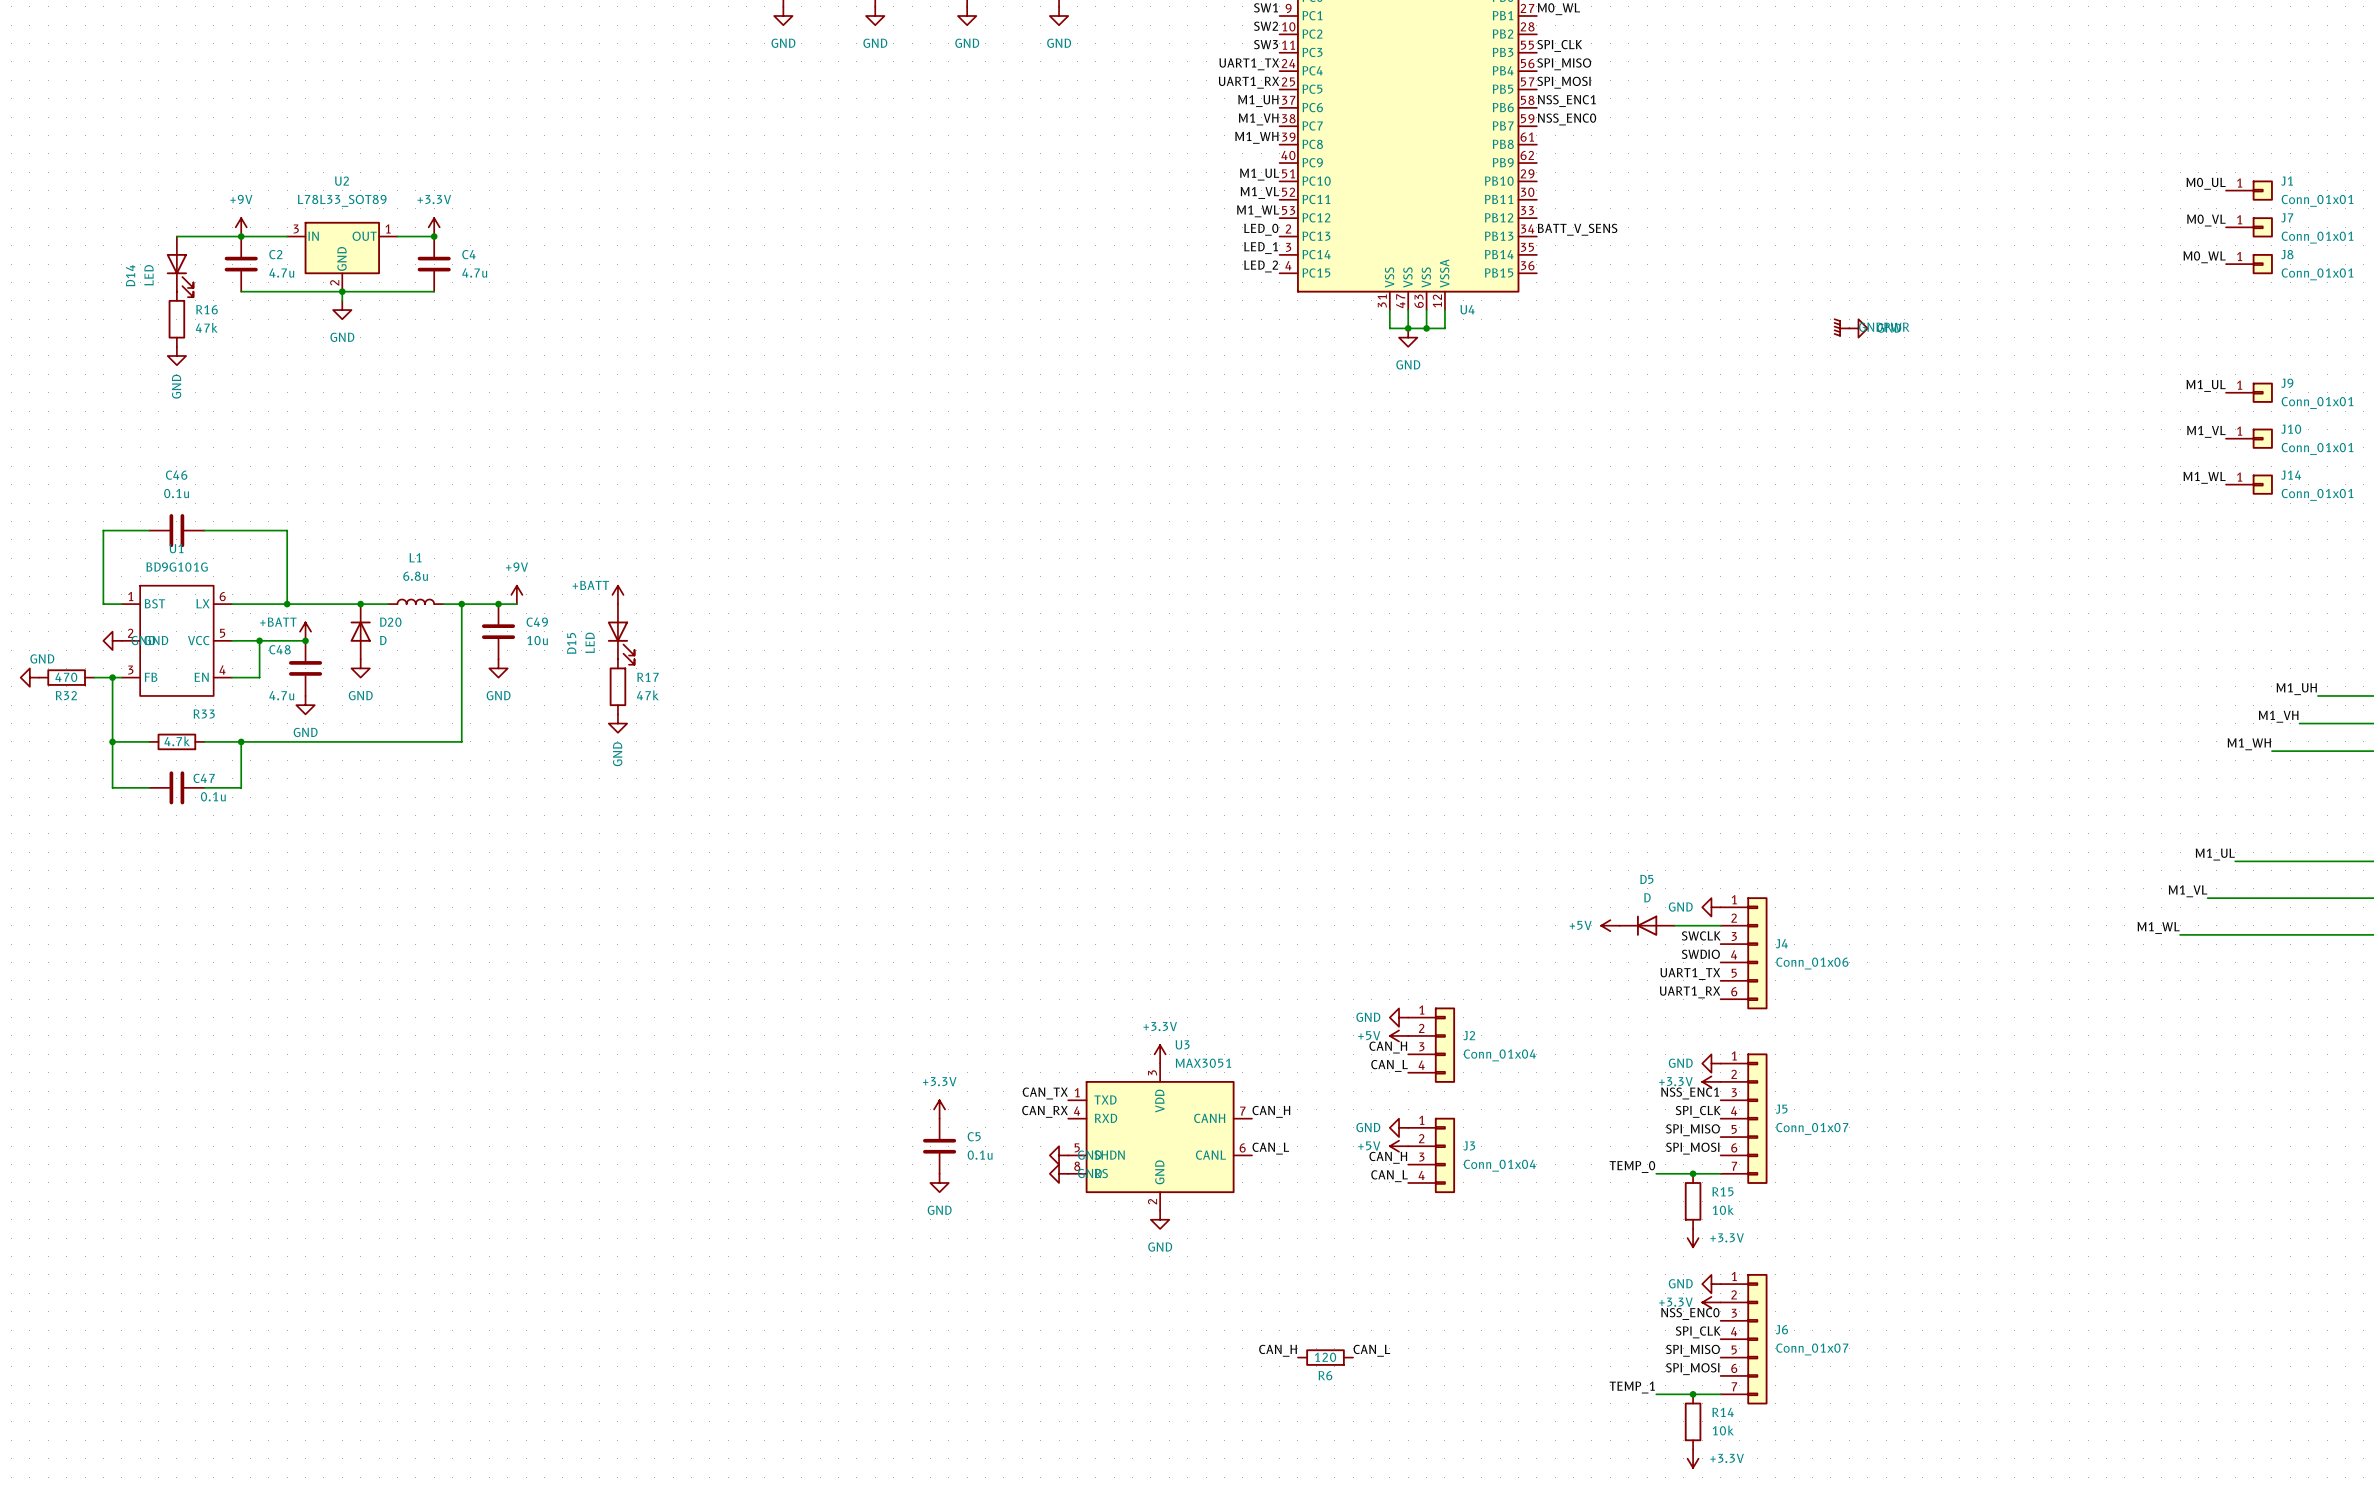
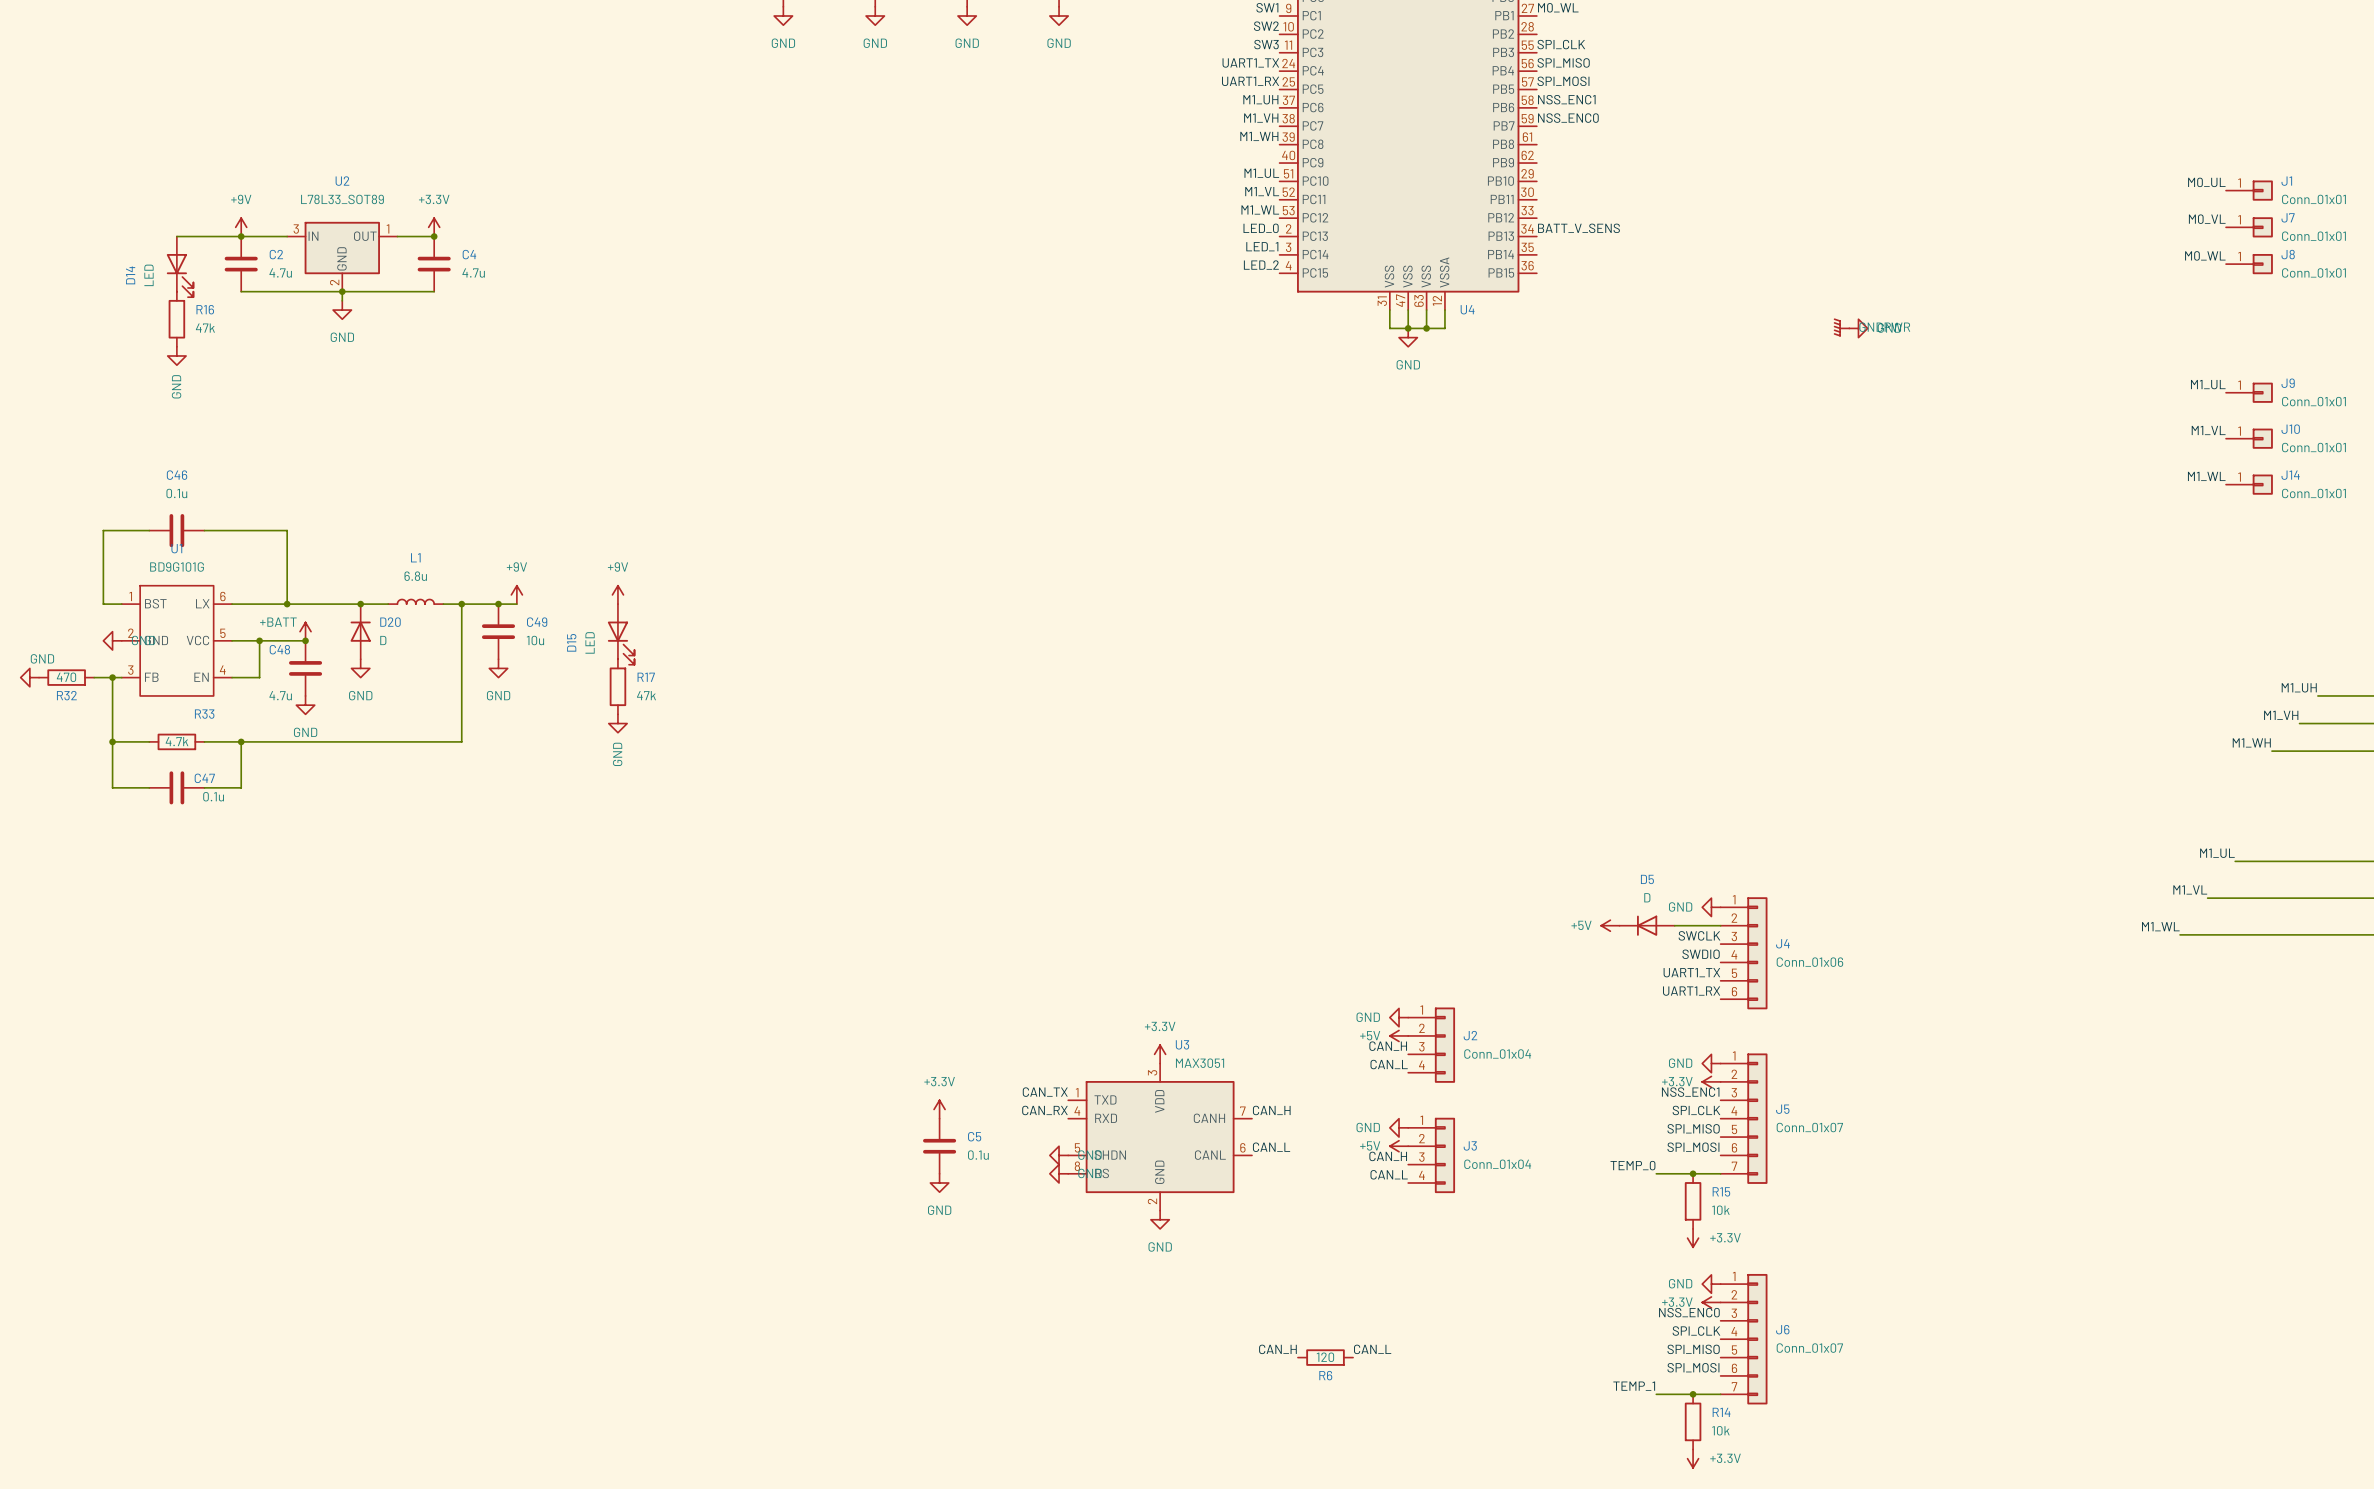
power symbol: +BATT (617, 594) -> +9V (617, 594)

